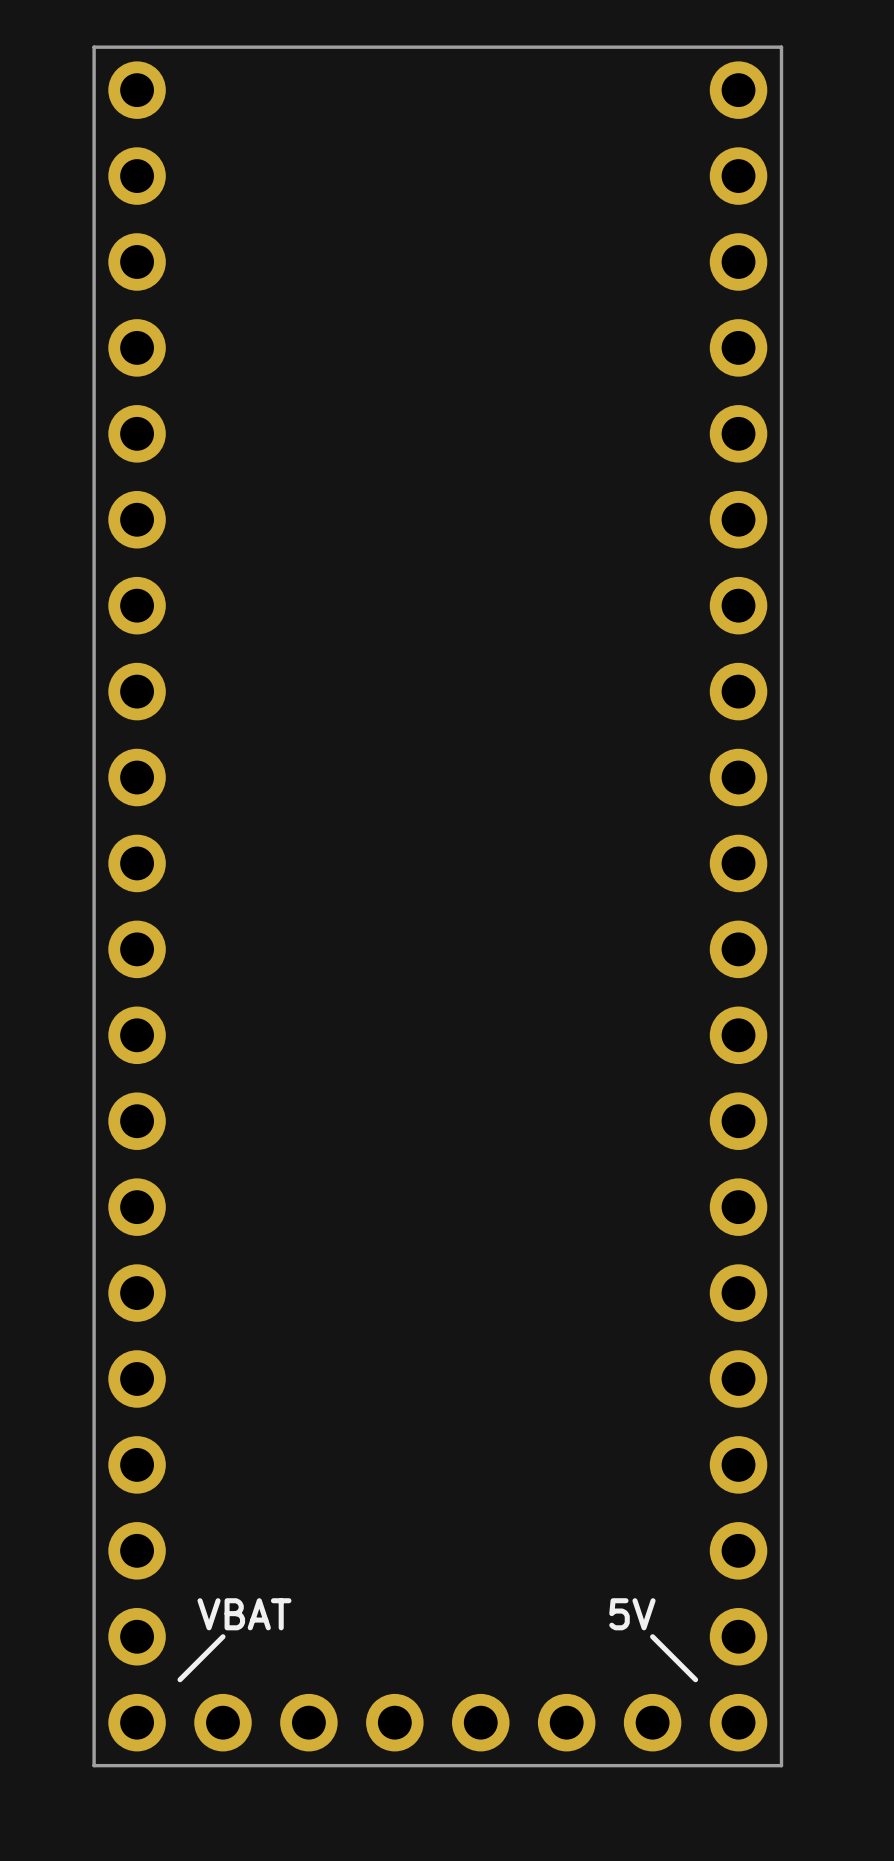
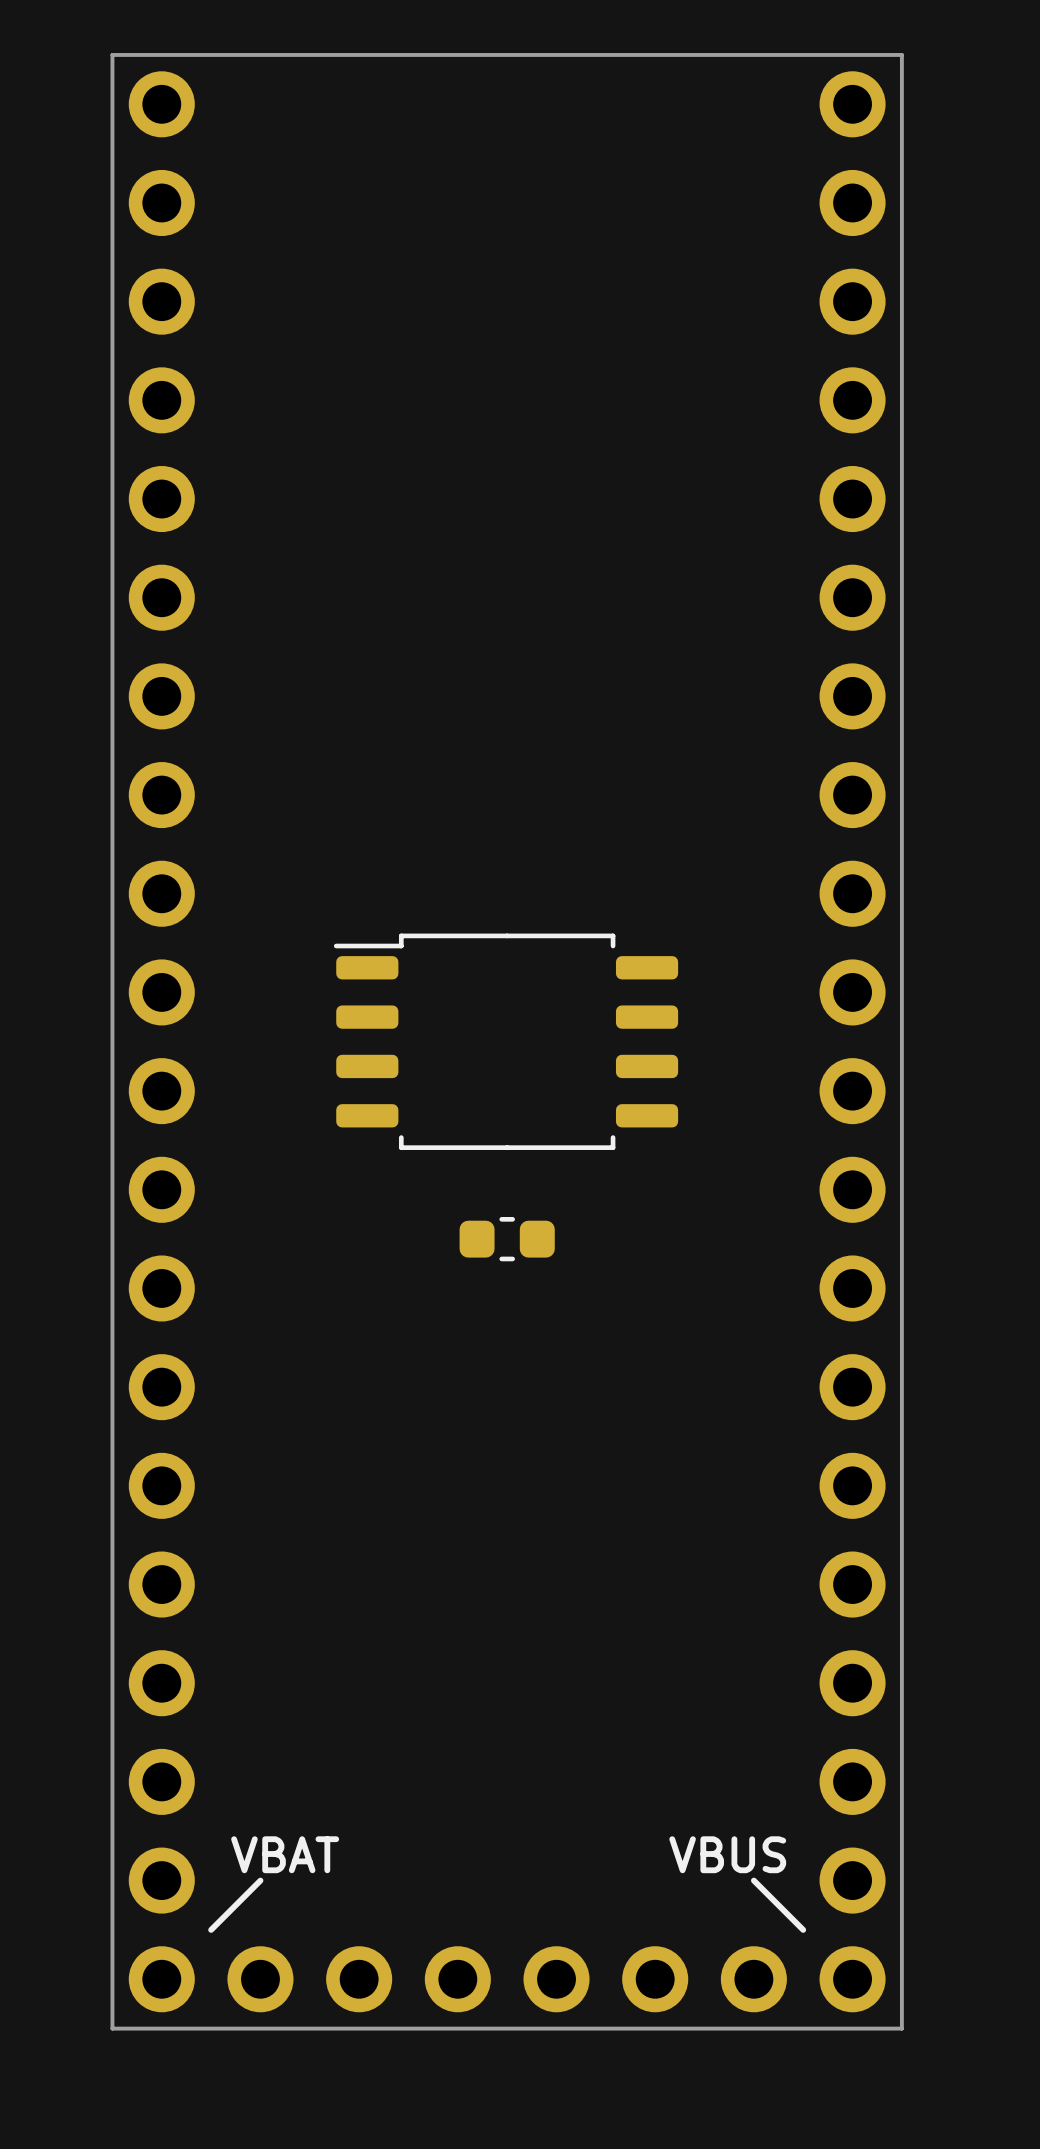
part: none -> (506, 1041)
part: none -> (507, 1239)
text: 5V (632, 1614) -> VBUS (727, 1854)

